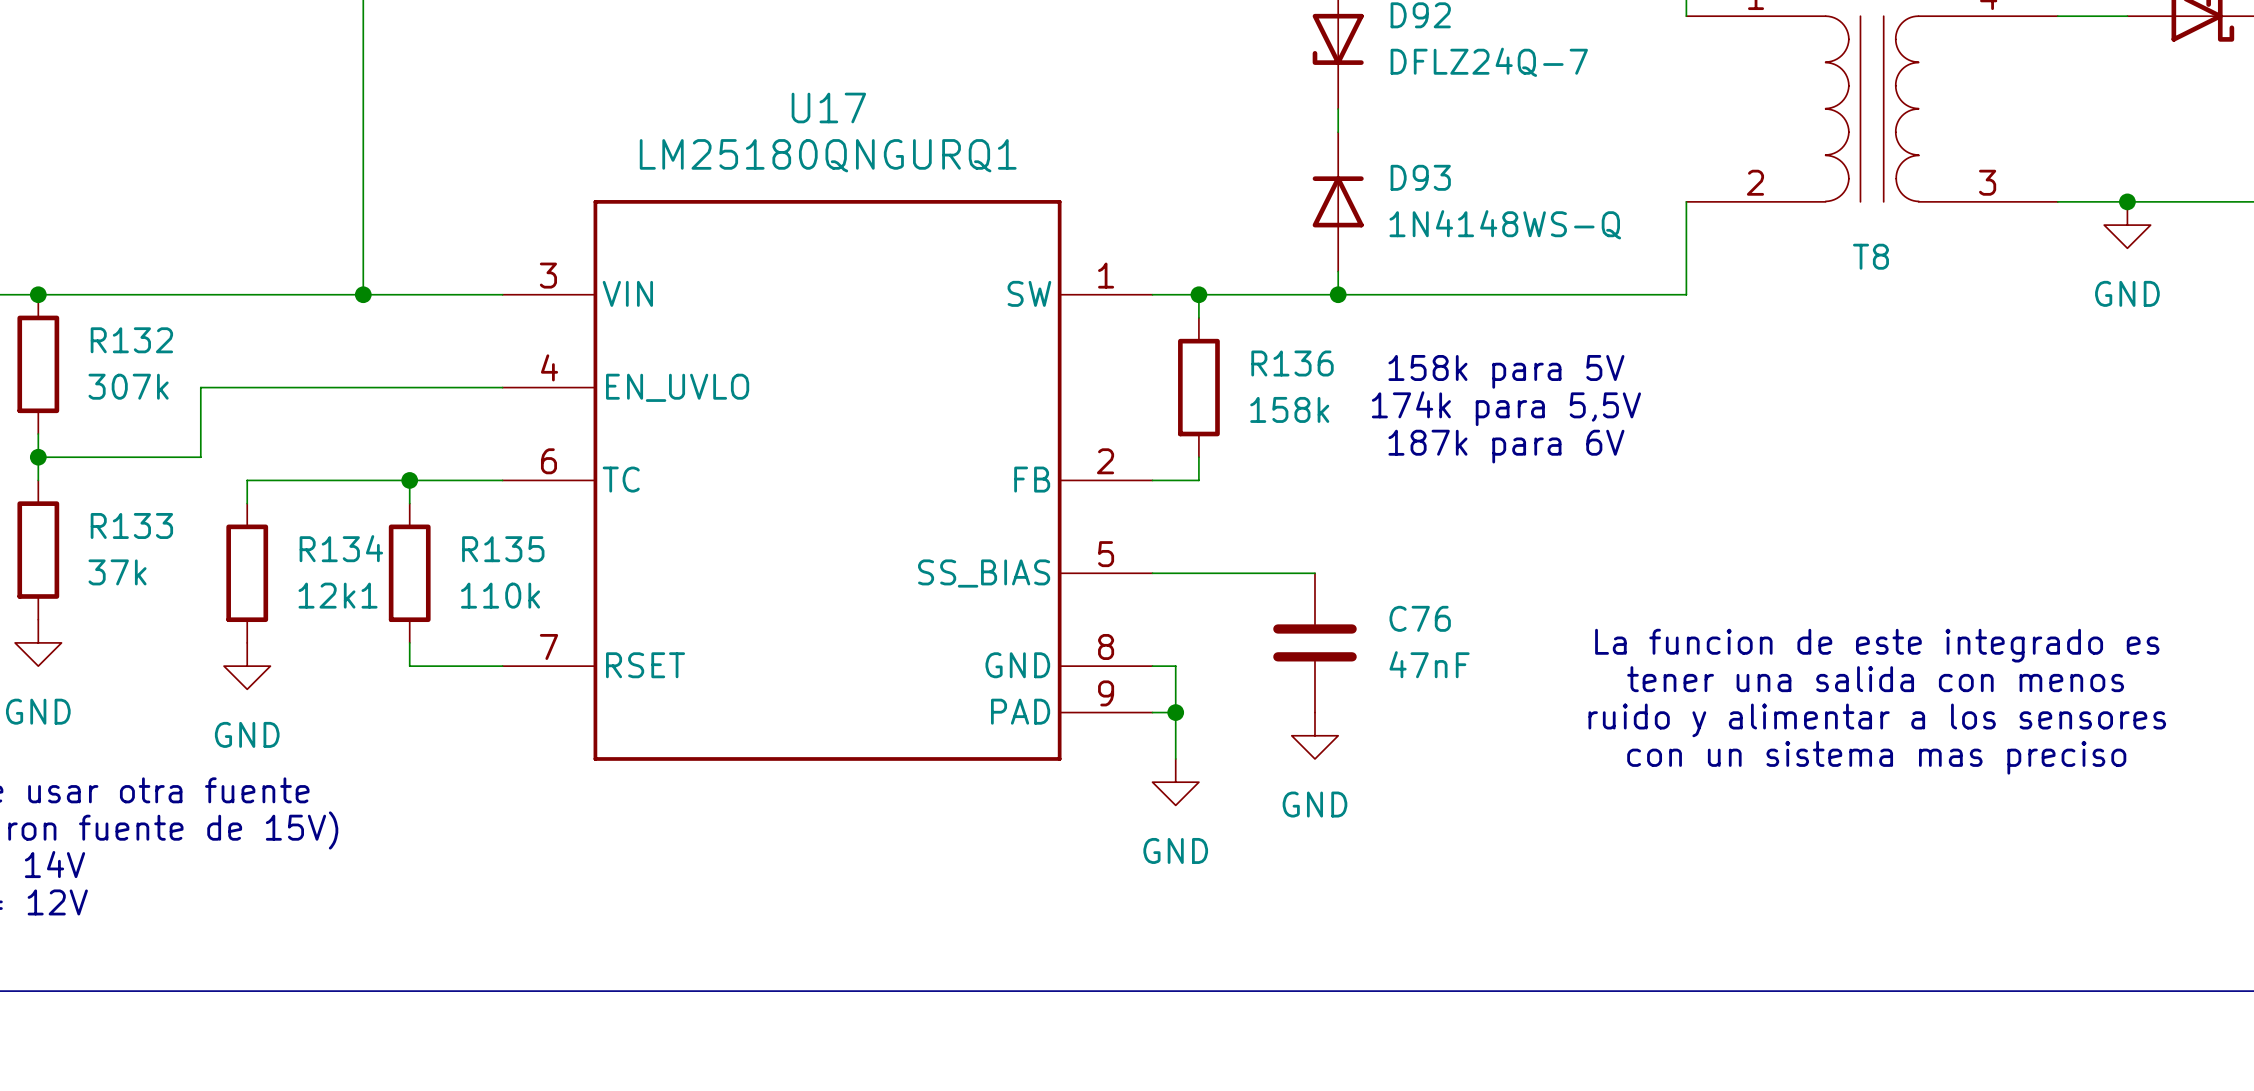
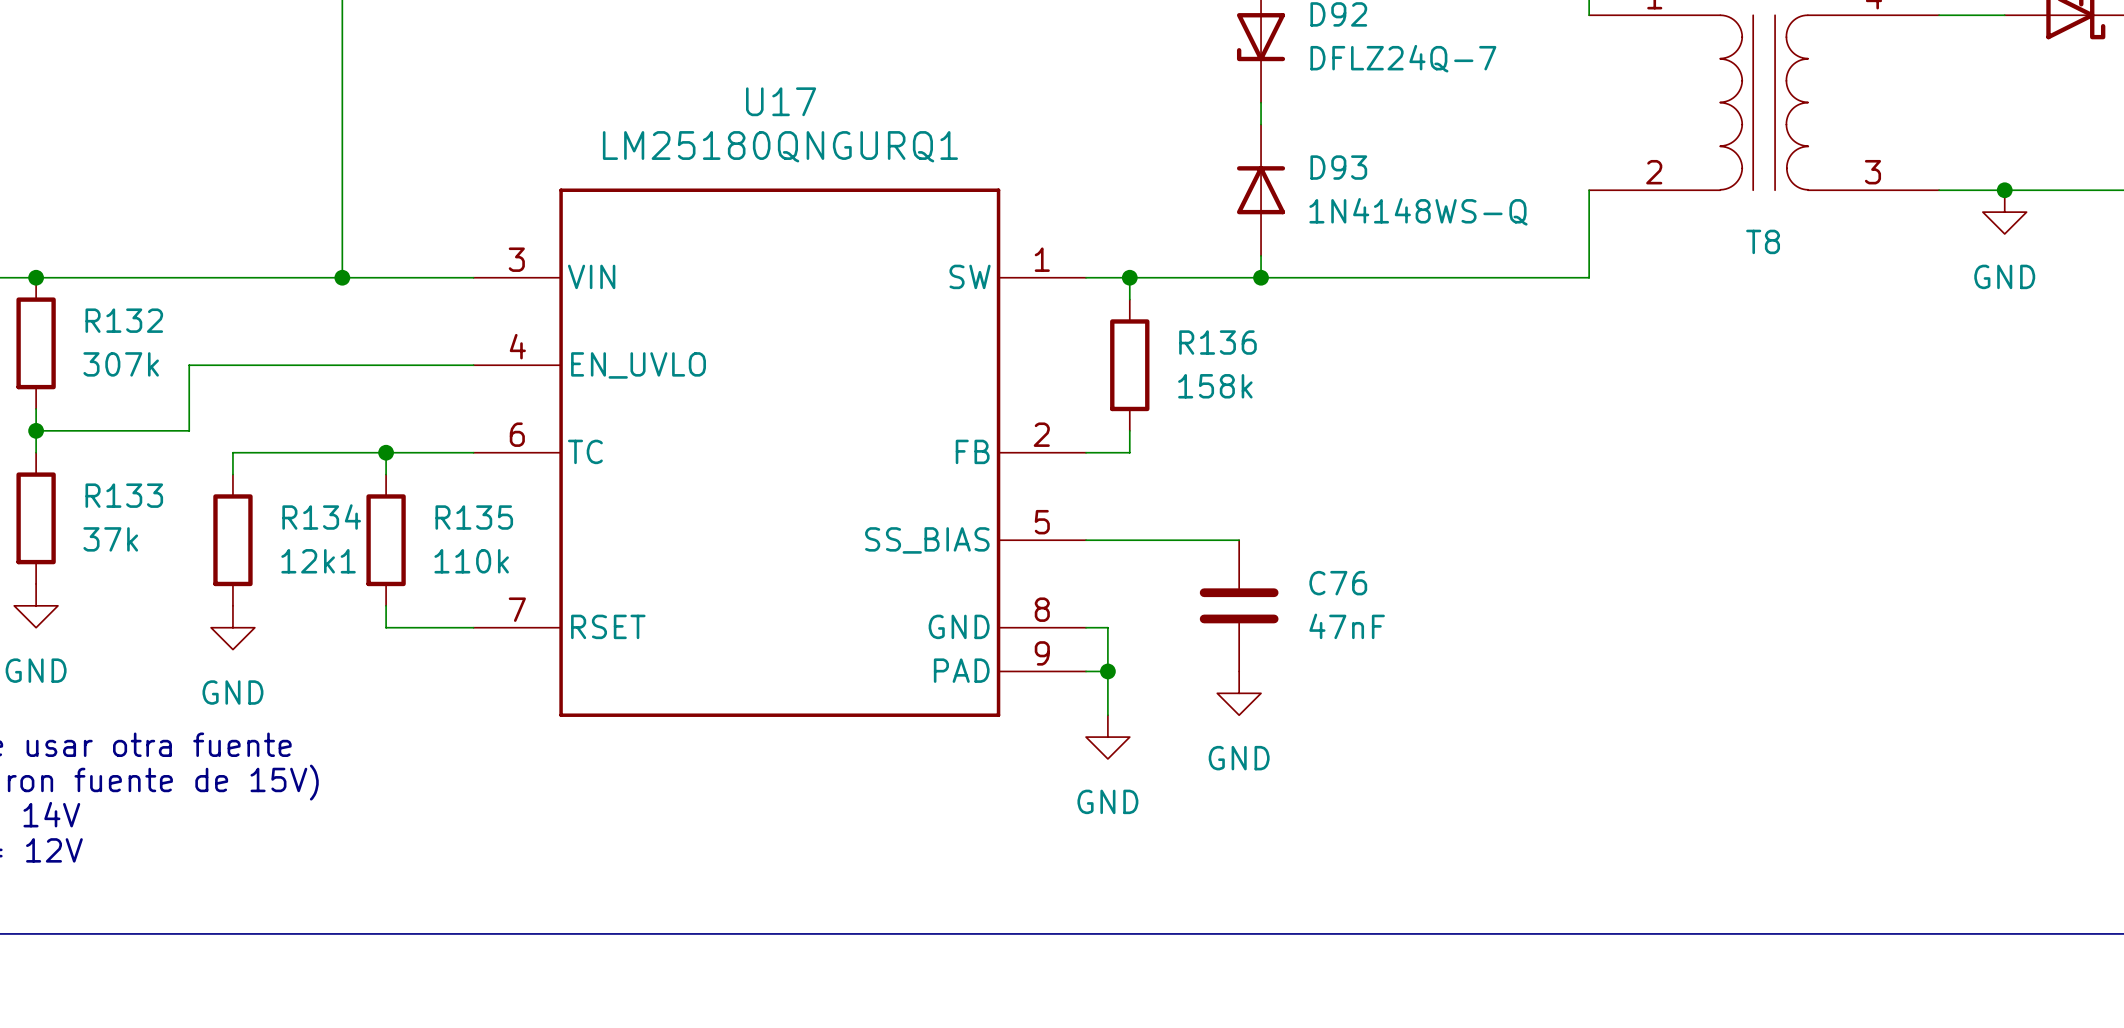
text: 158k para 5V (1506, 371) -> none
text: 174k para 5,5V (1506, 408) -> none
text: 187k para 6V (1506, 446) -> none
text: La funcion de este integrado es (1877, 645) -> none
text: tener una salida con menos (1875, 679) -> none
text: ruido y alimentar a los sensores (1877, 720) -> none
text: con un sistema mas preciso (1876, 757) -> none

